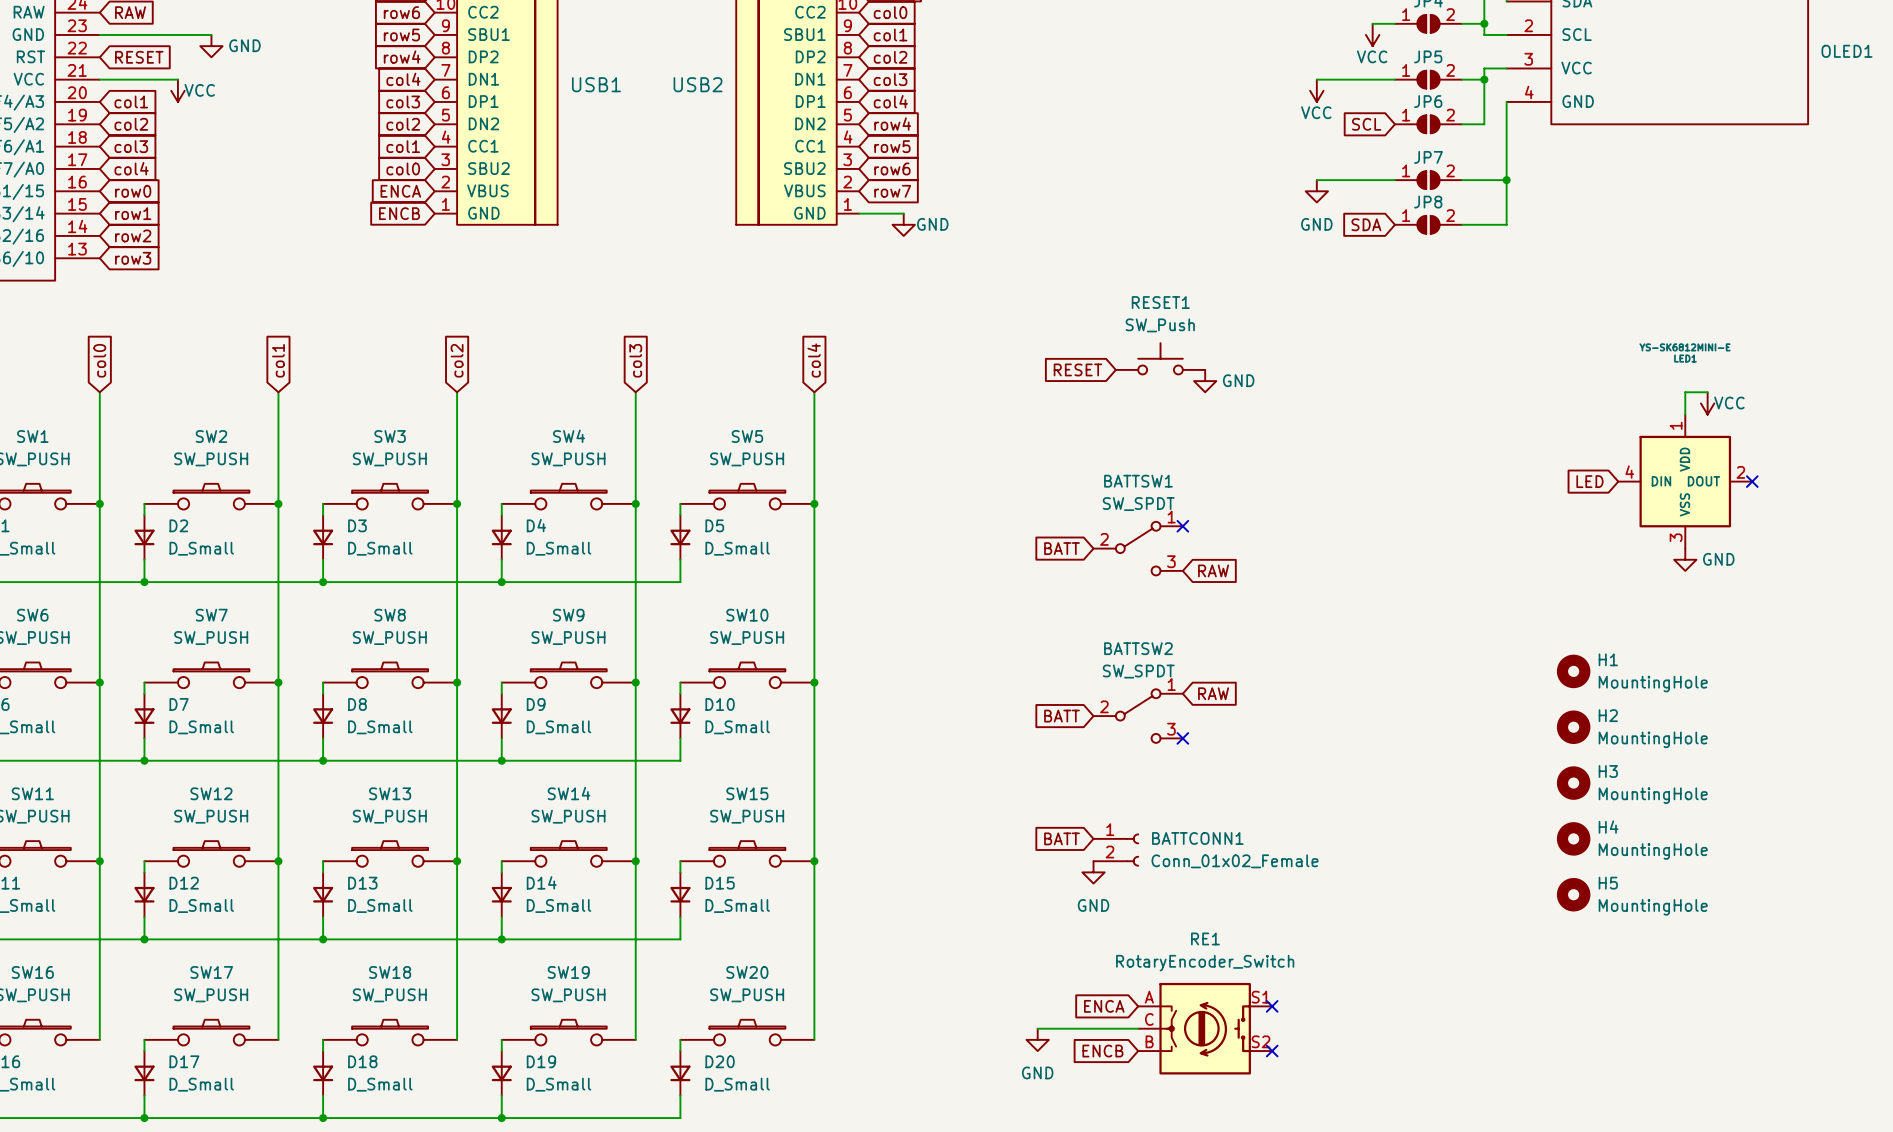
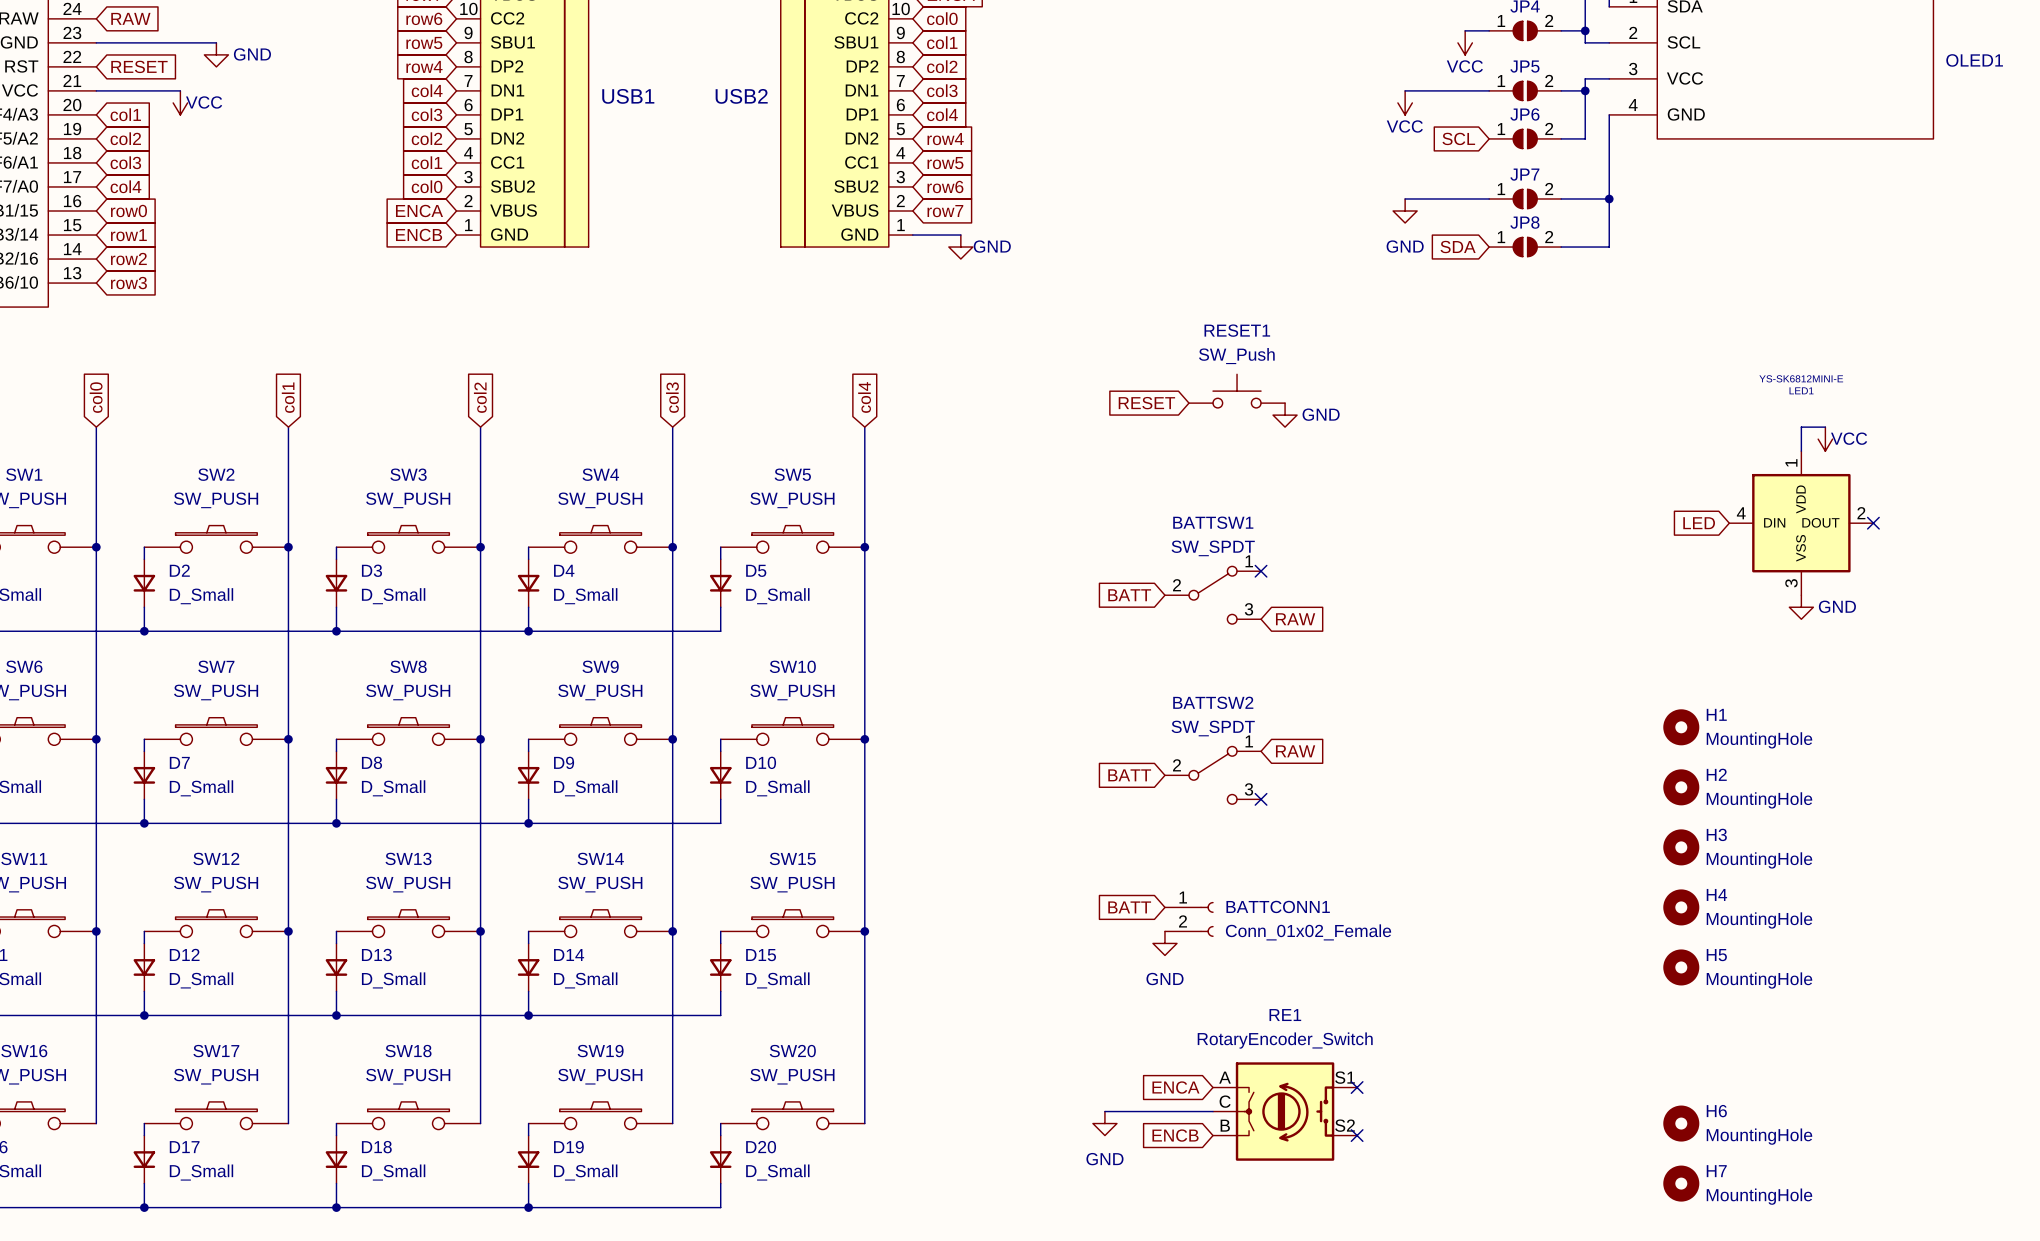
H6: none -> MountingHole (1681, 1123)
H7: none -> MountingHole (1681, 1183)

